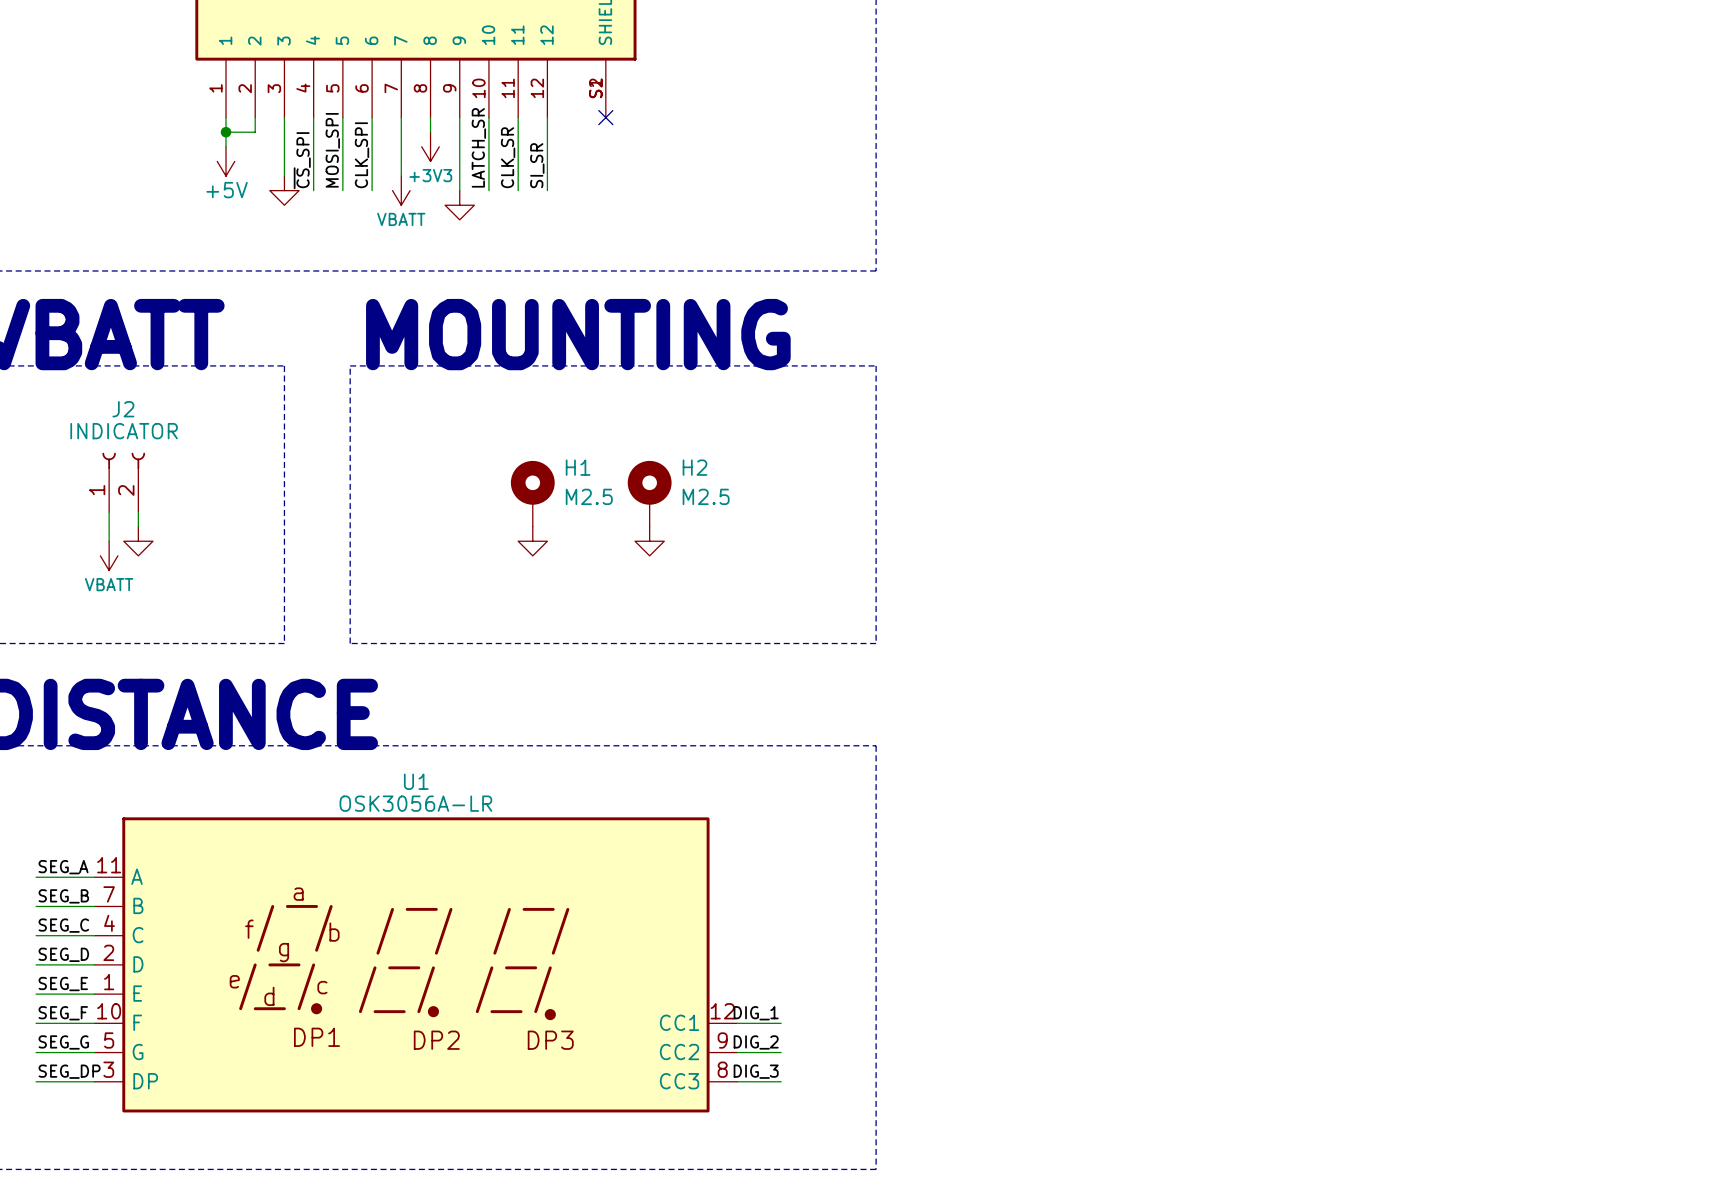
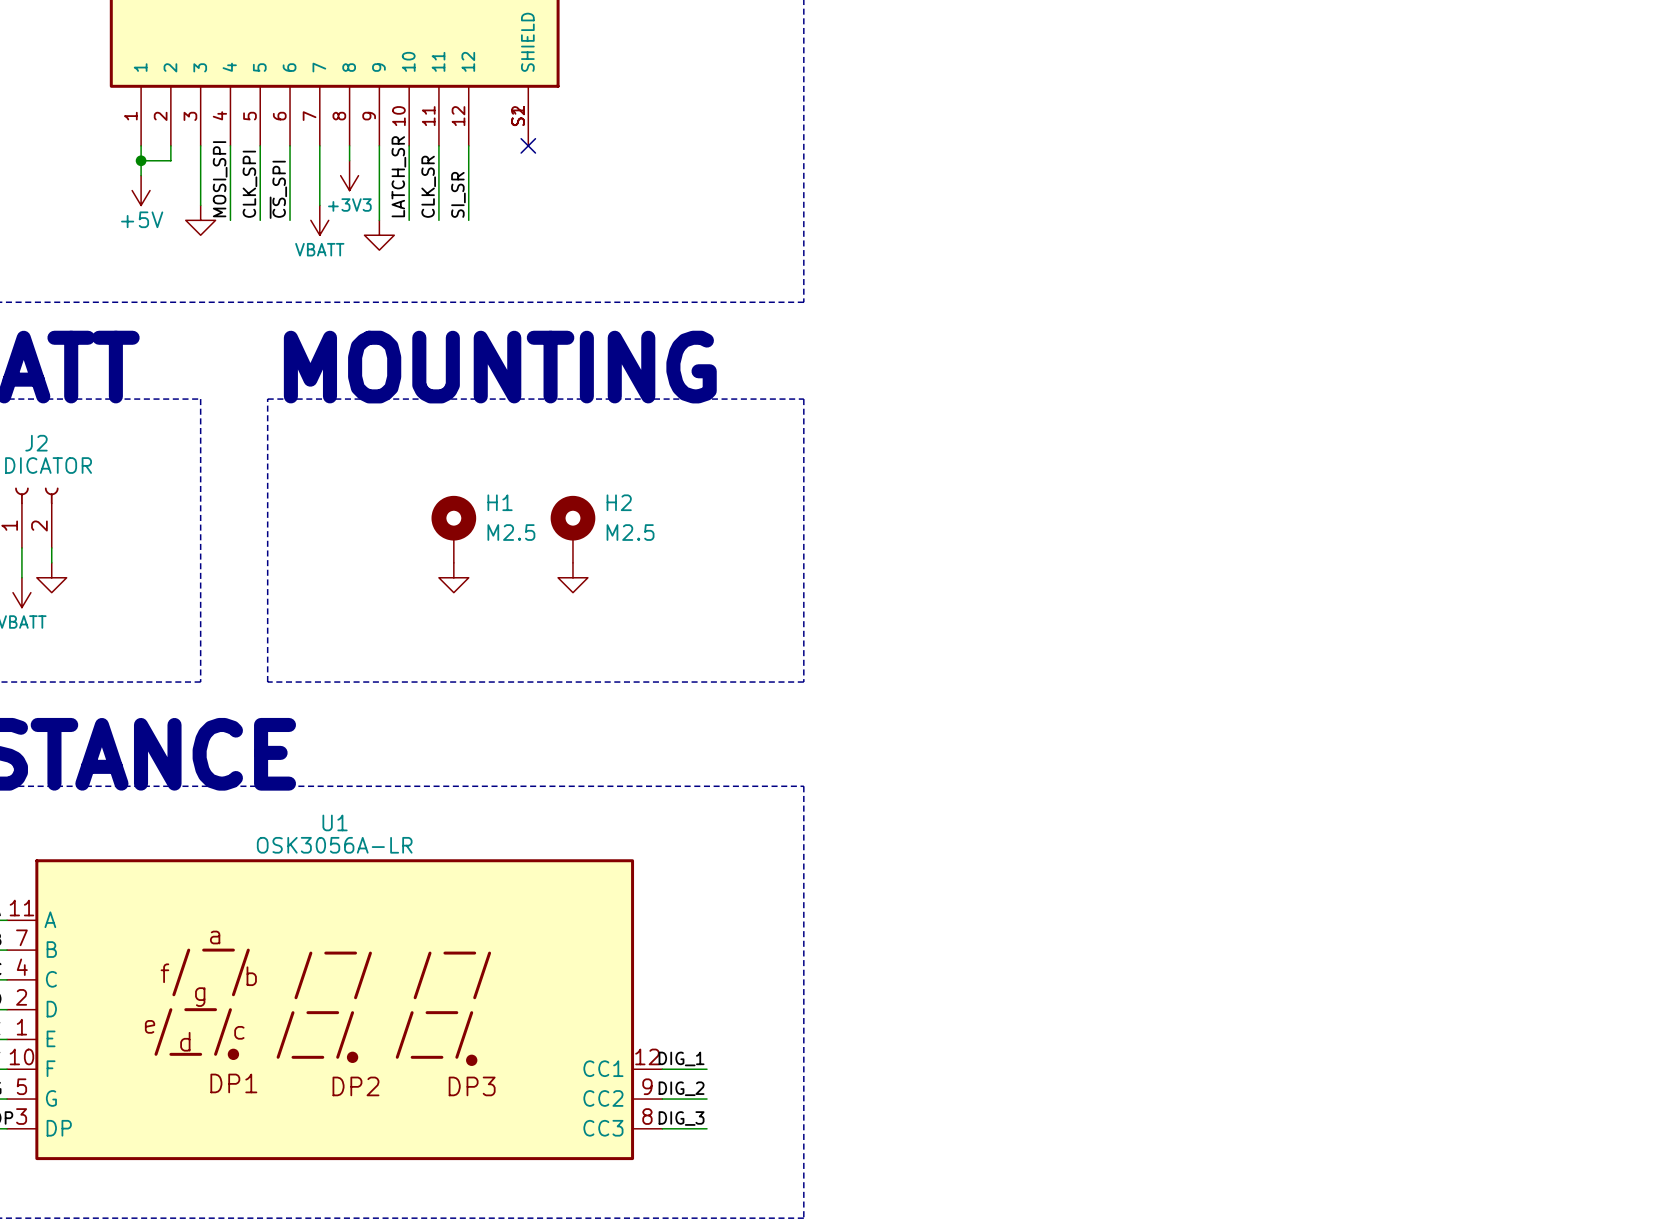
label: MOSI_SPI (332, 150) -> CLK_SPI (249, 184)
label: CLK_SPI (362, 155) -> ~{CS}_SPI (278, 189)
label: ~{CS}_SPI (302, 160) -> MOSI_SPI (220, 179)

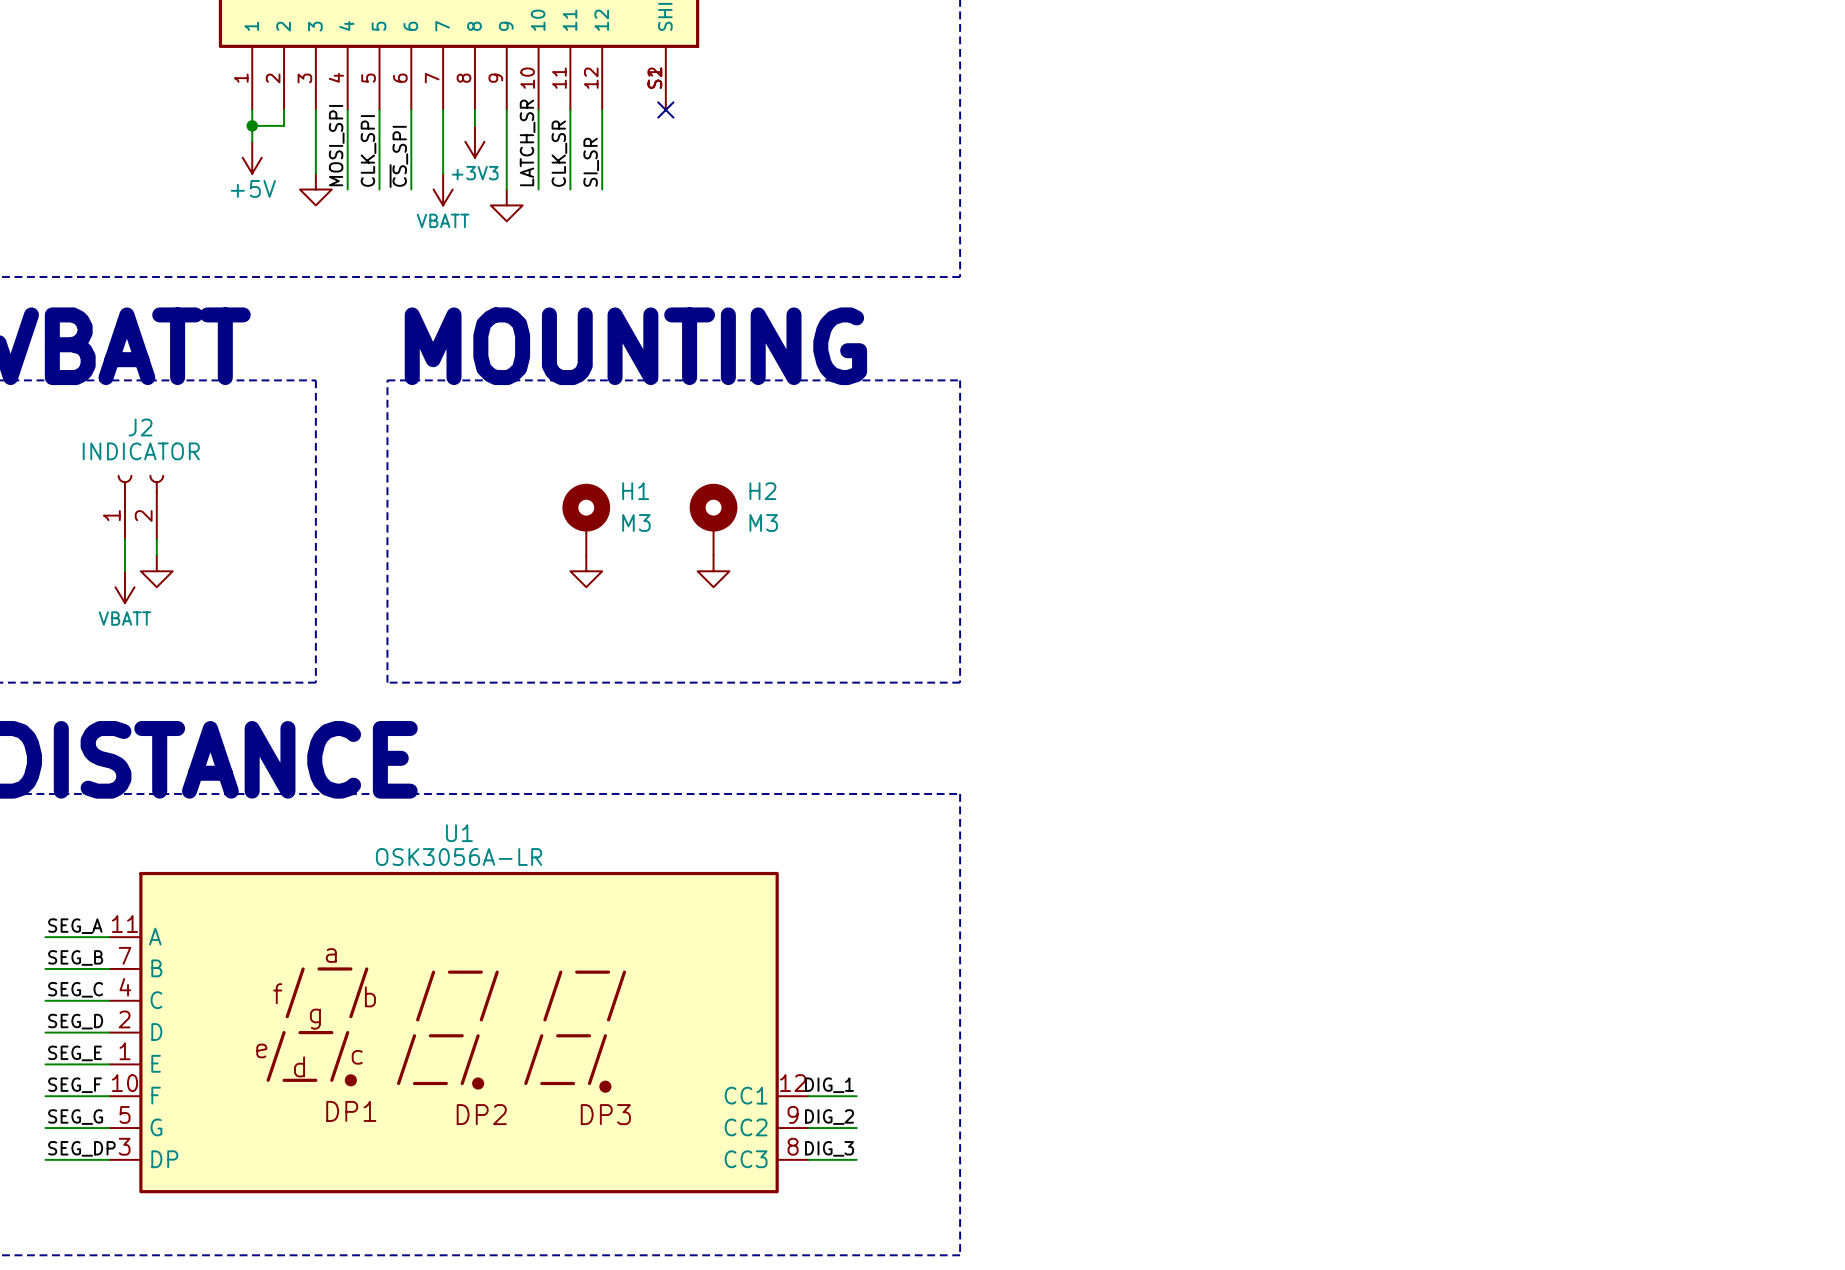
H1 value: M2.5 (511, 532) -> M3 (636, 522)
H2 value: M2.5 (630, 532) -> M3 (763, 522)

